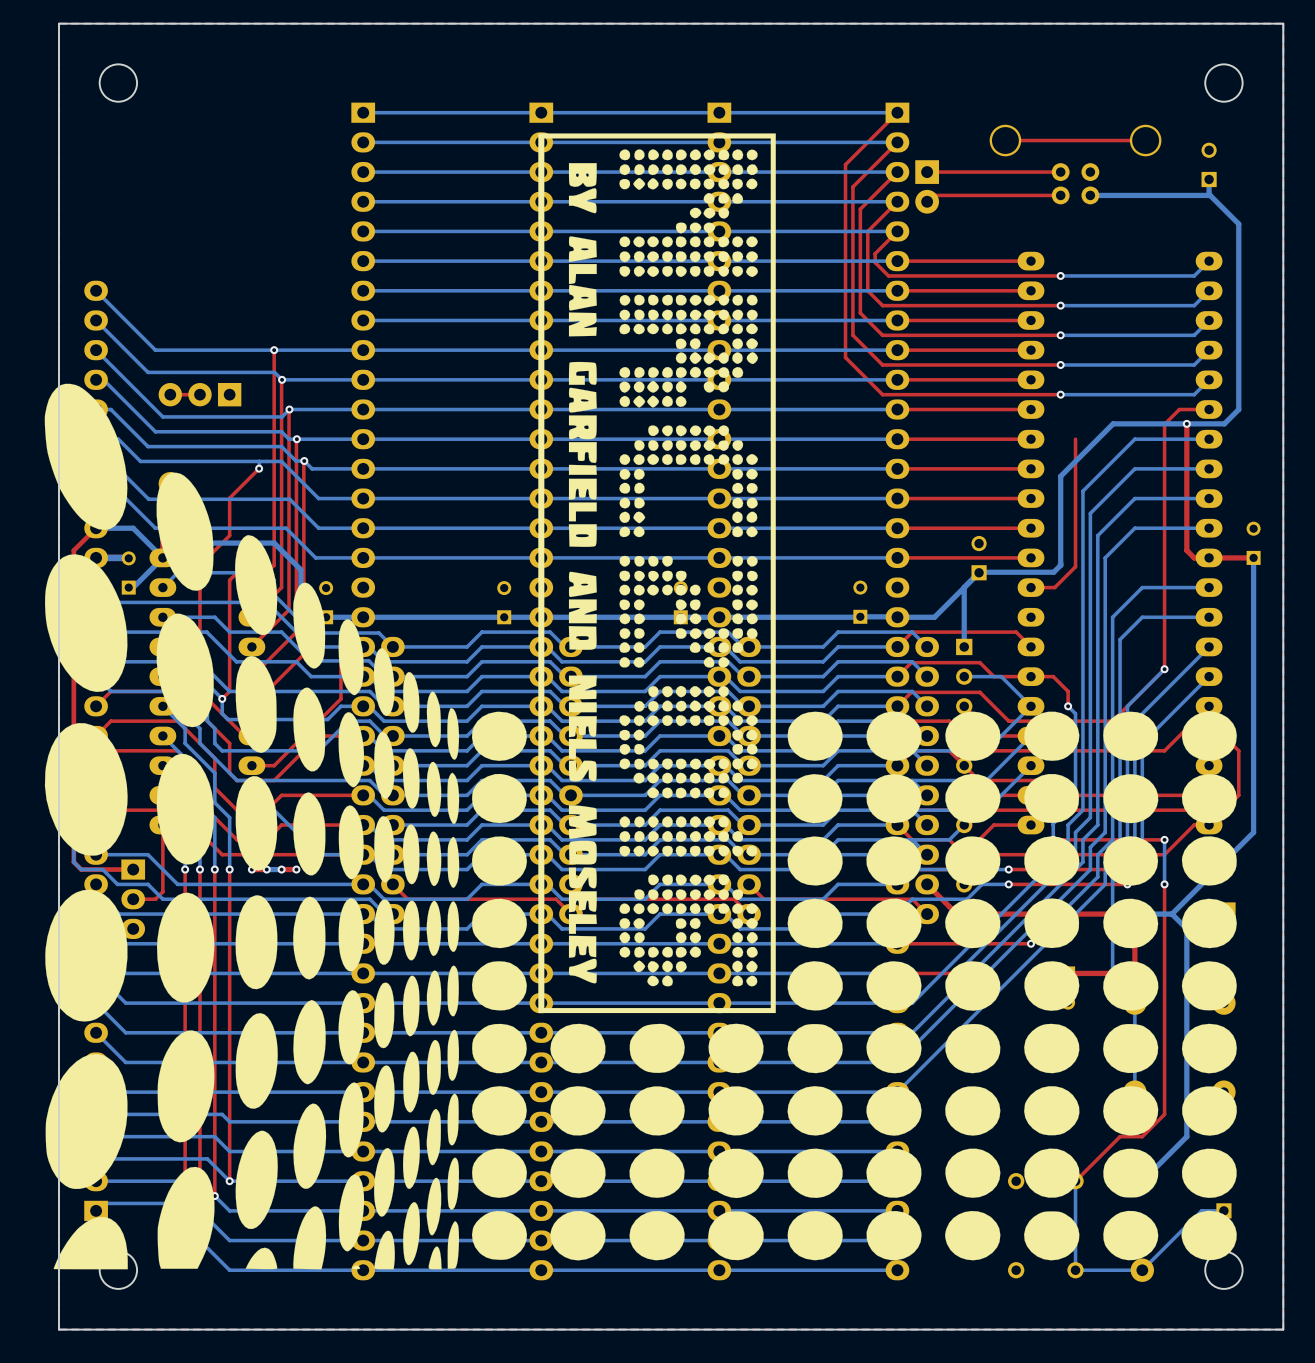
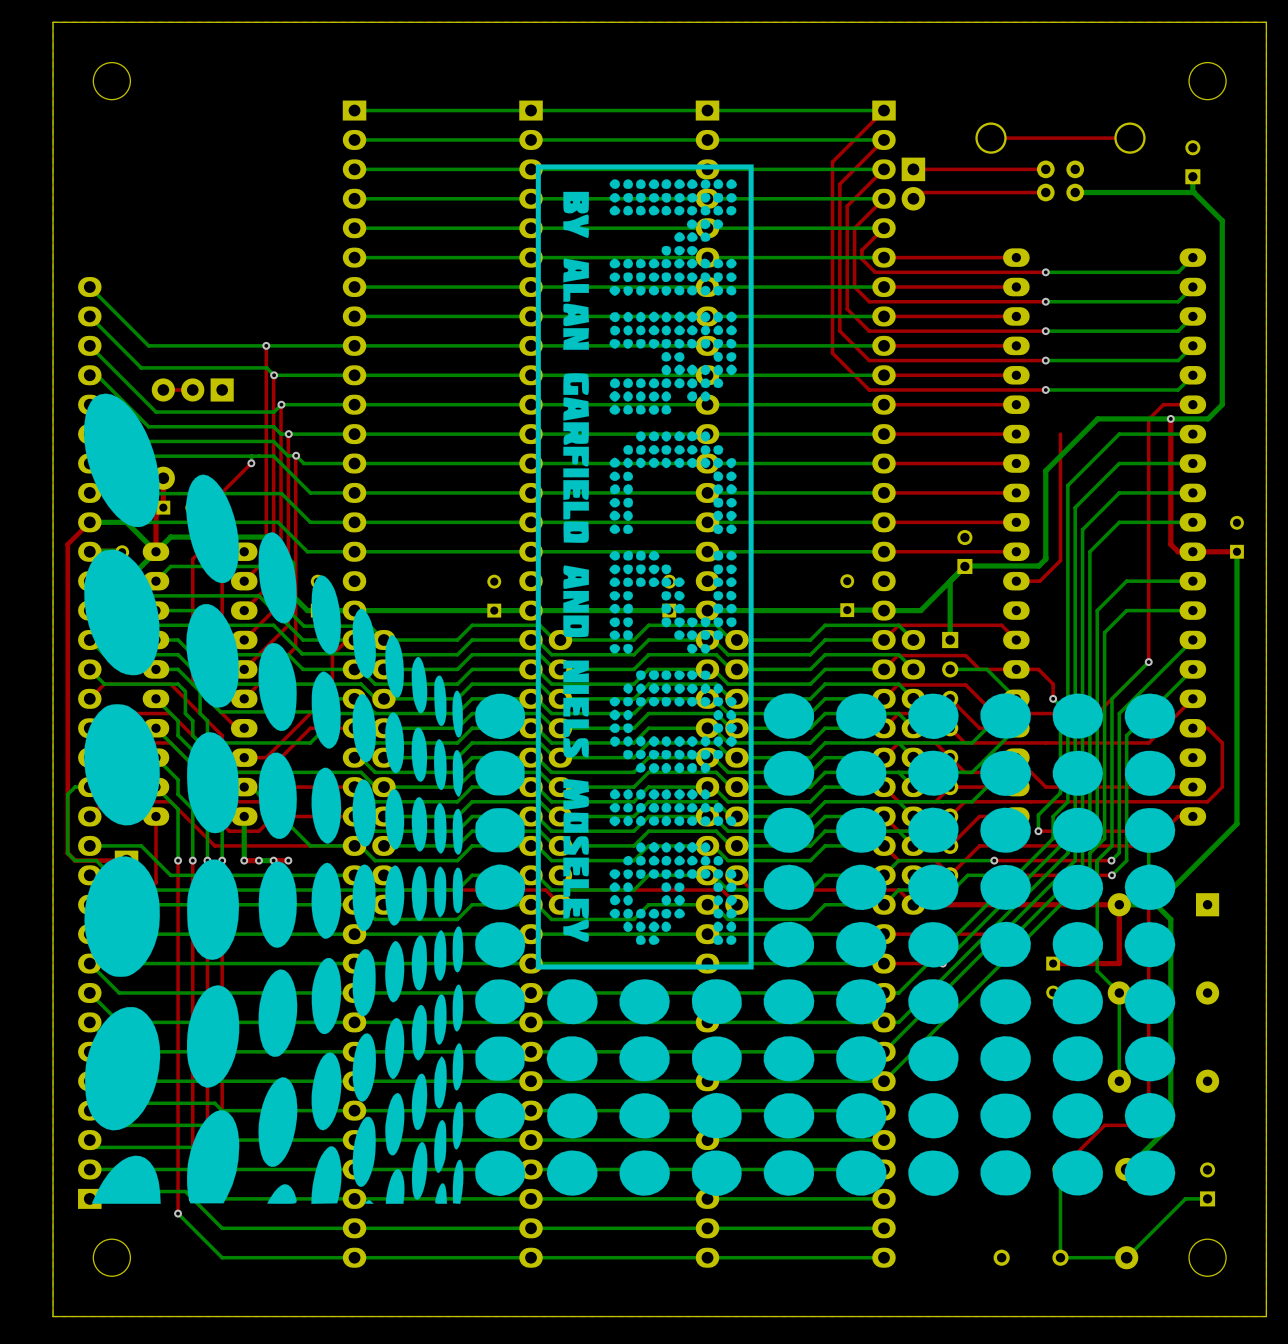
drawing shape: [44, 133, 1237, 1270] -> [84, 164, 1176, 1204]

